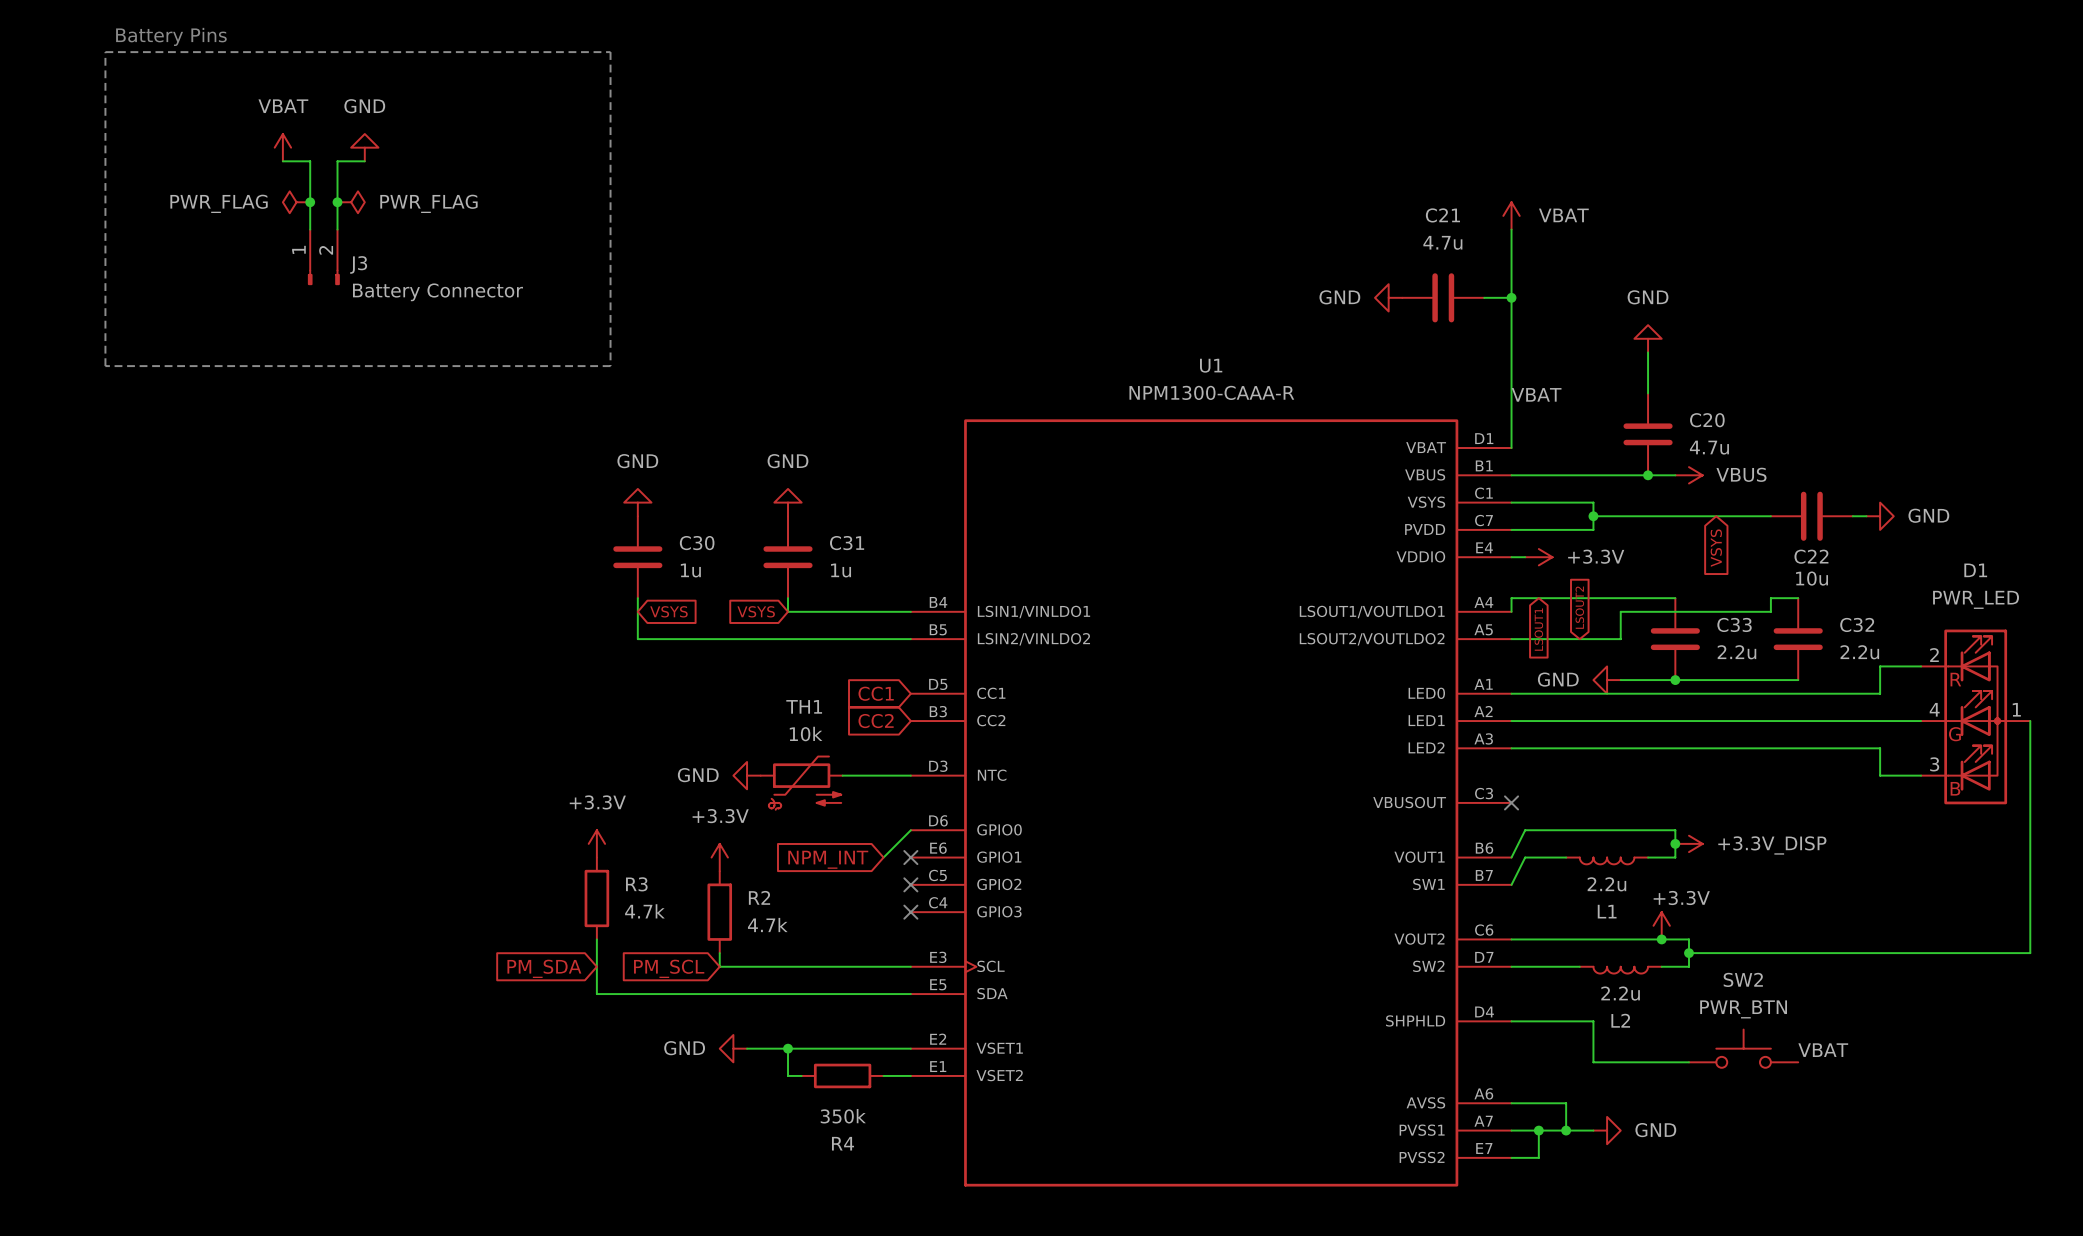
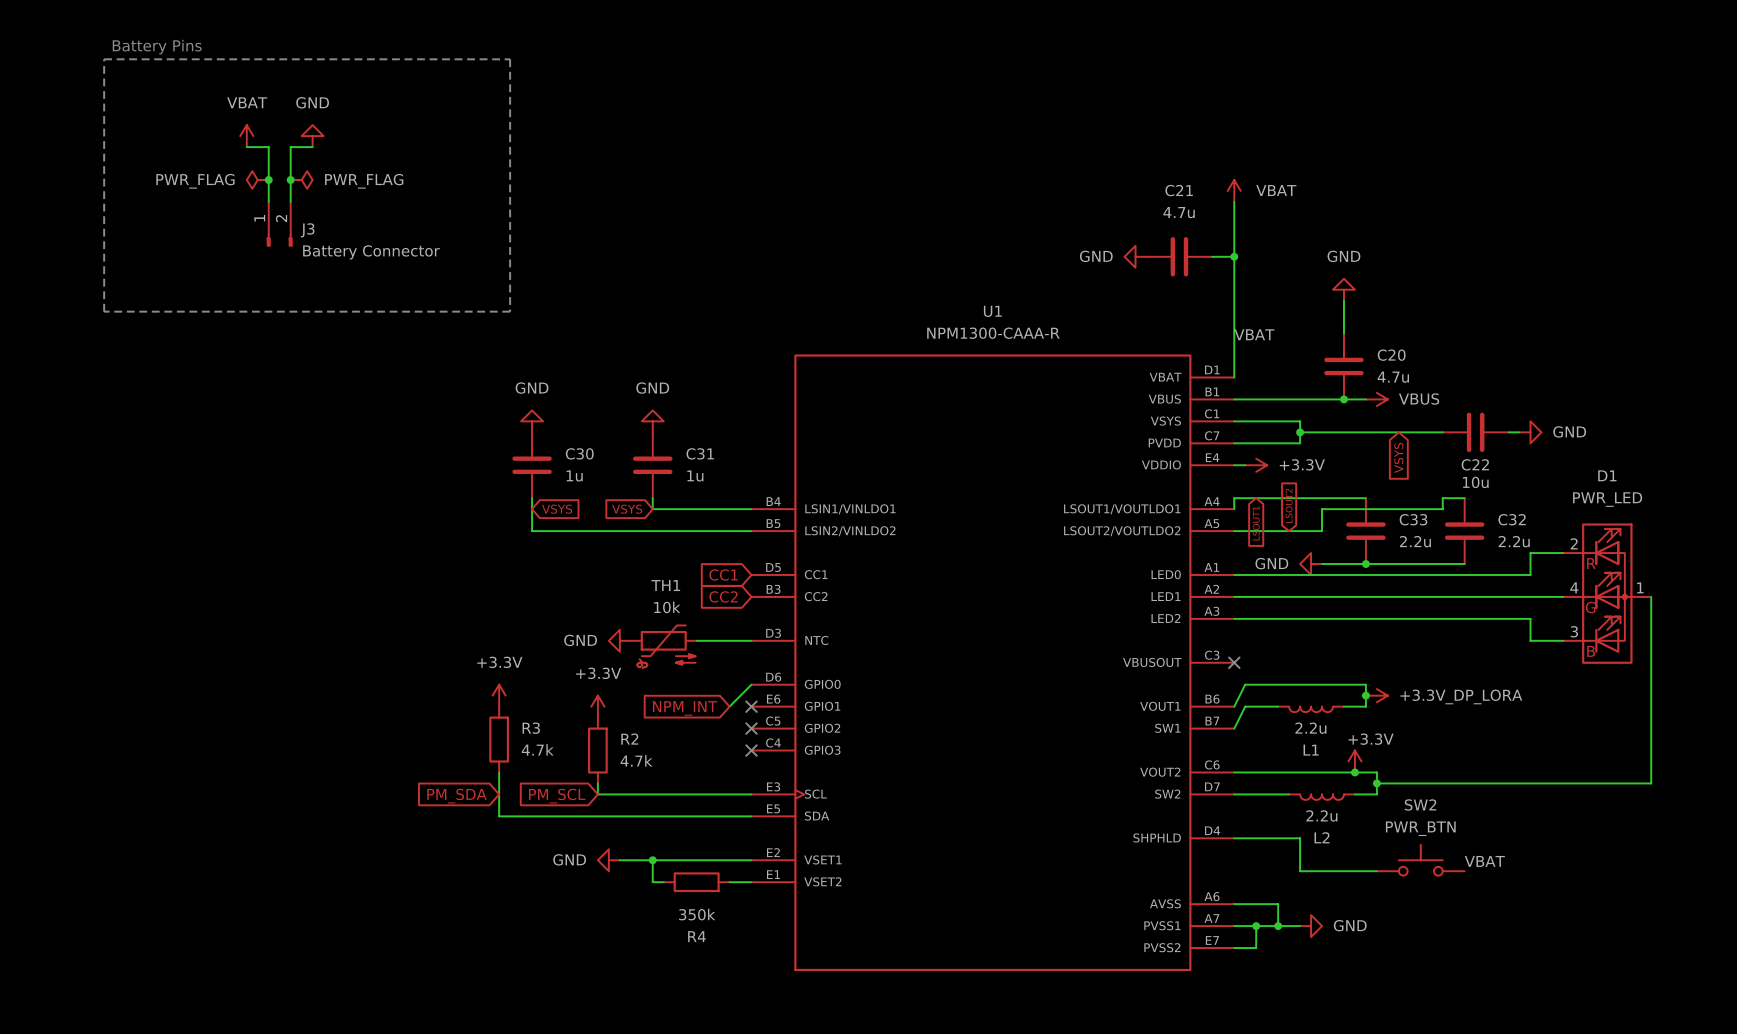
power symbol: +3.3V_DISP (1689, 843) -> +3.3V_DP_LORA (1376, 695)

